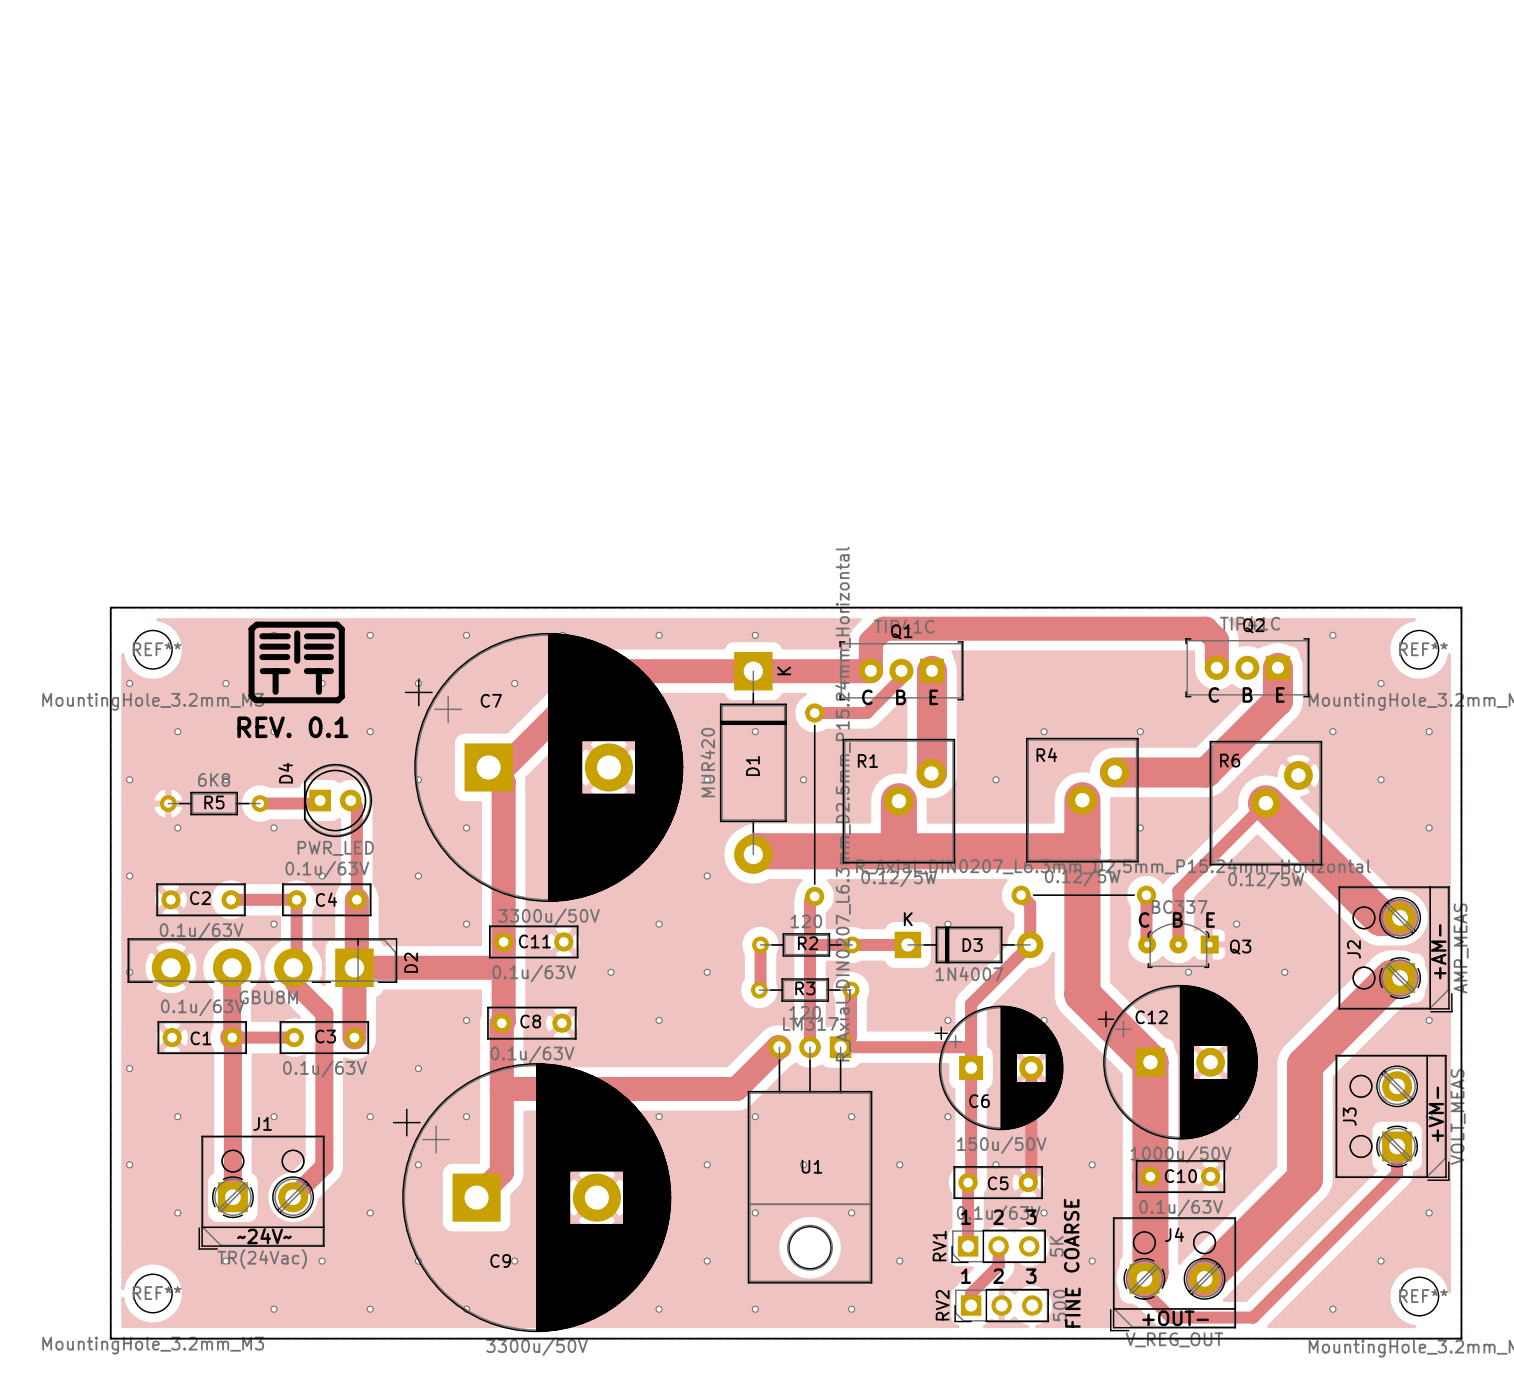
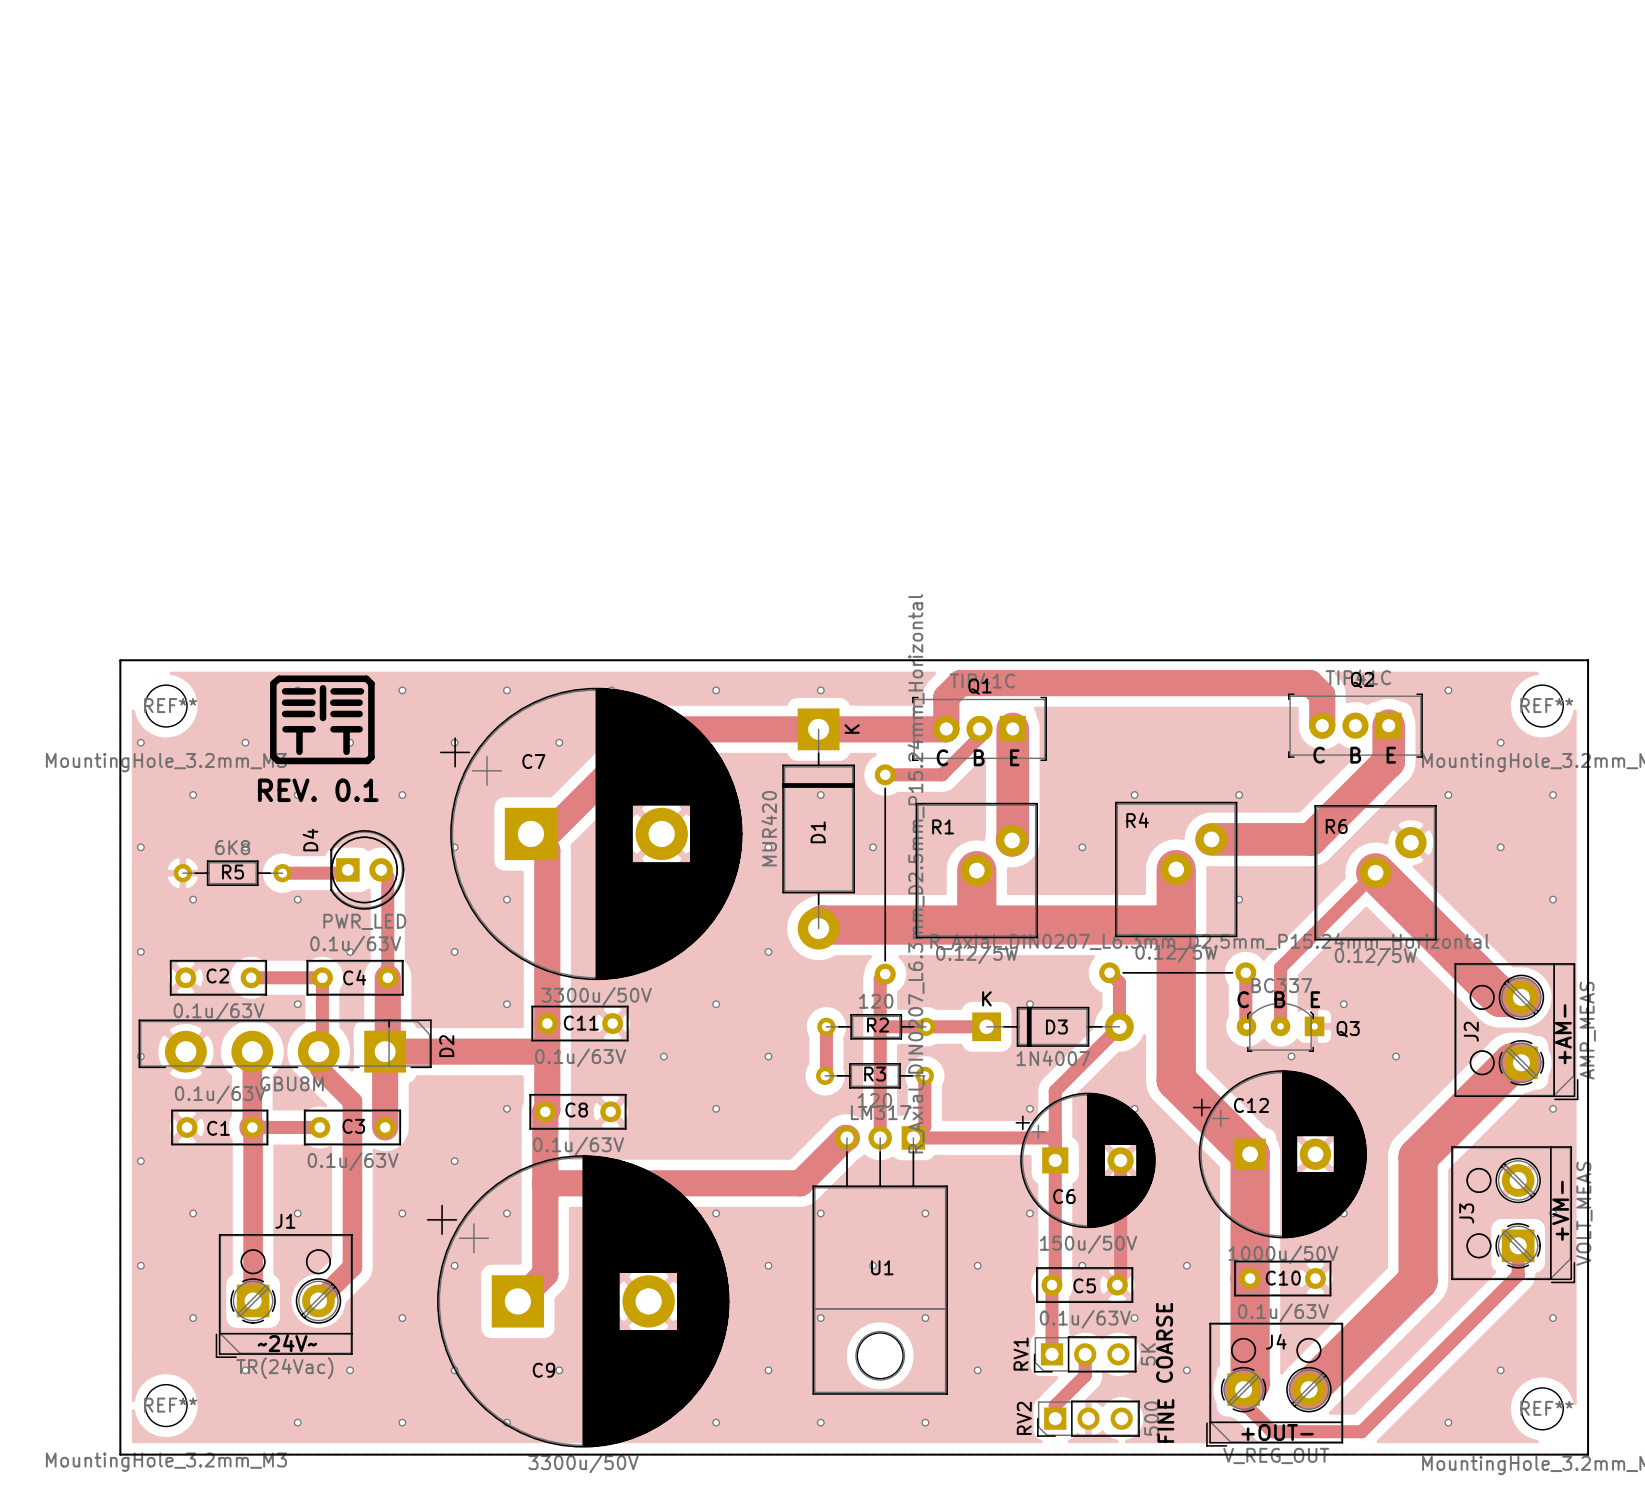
text: 1 2 3 (998, 1217) -> none
text: 1 2 3 (998, 1276) -> none

